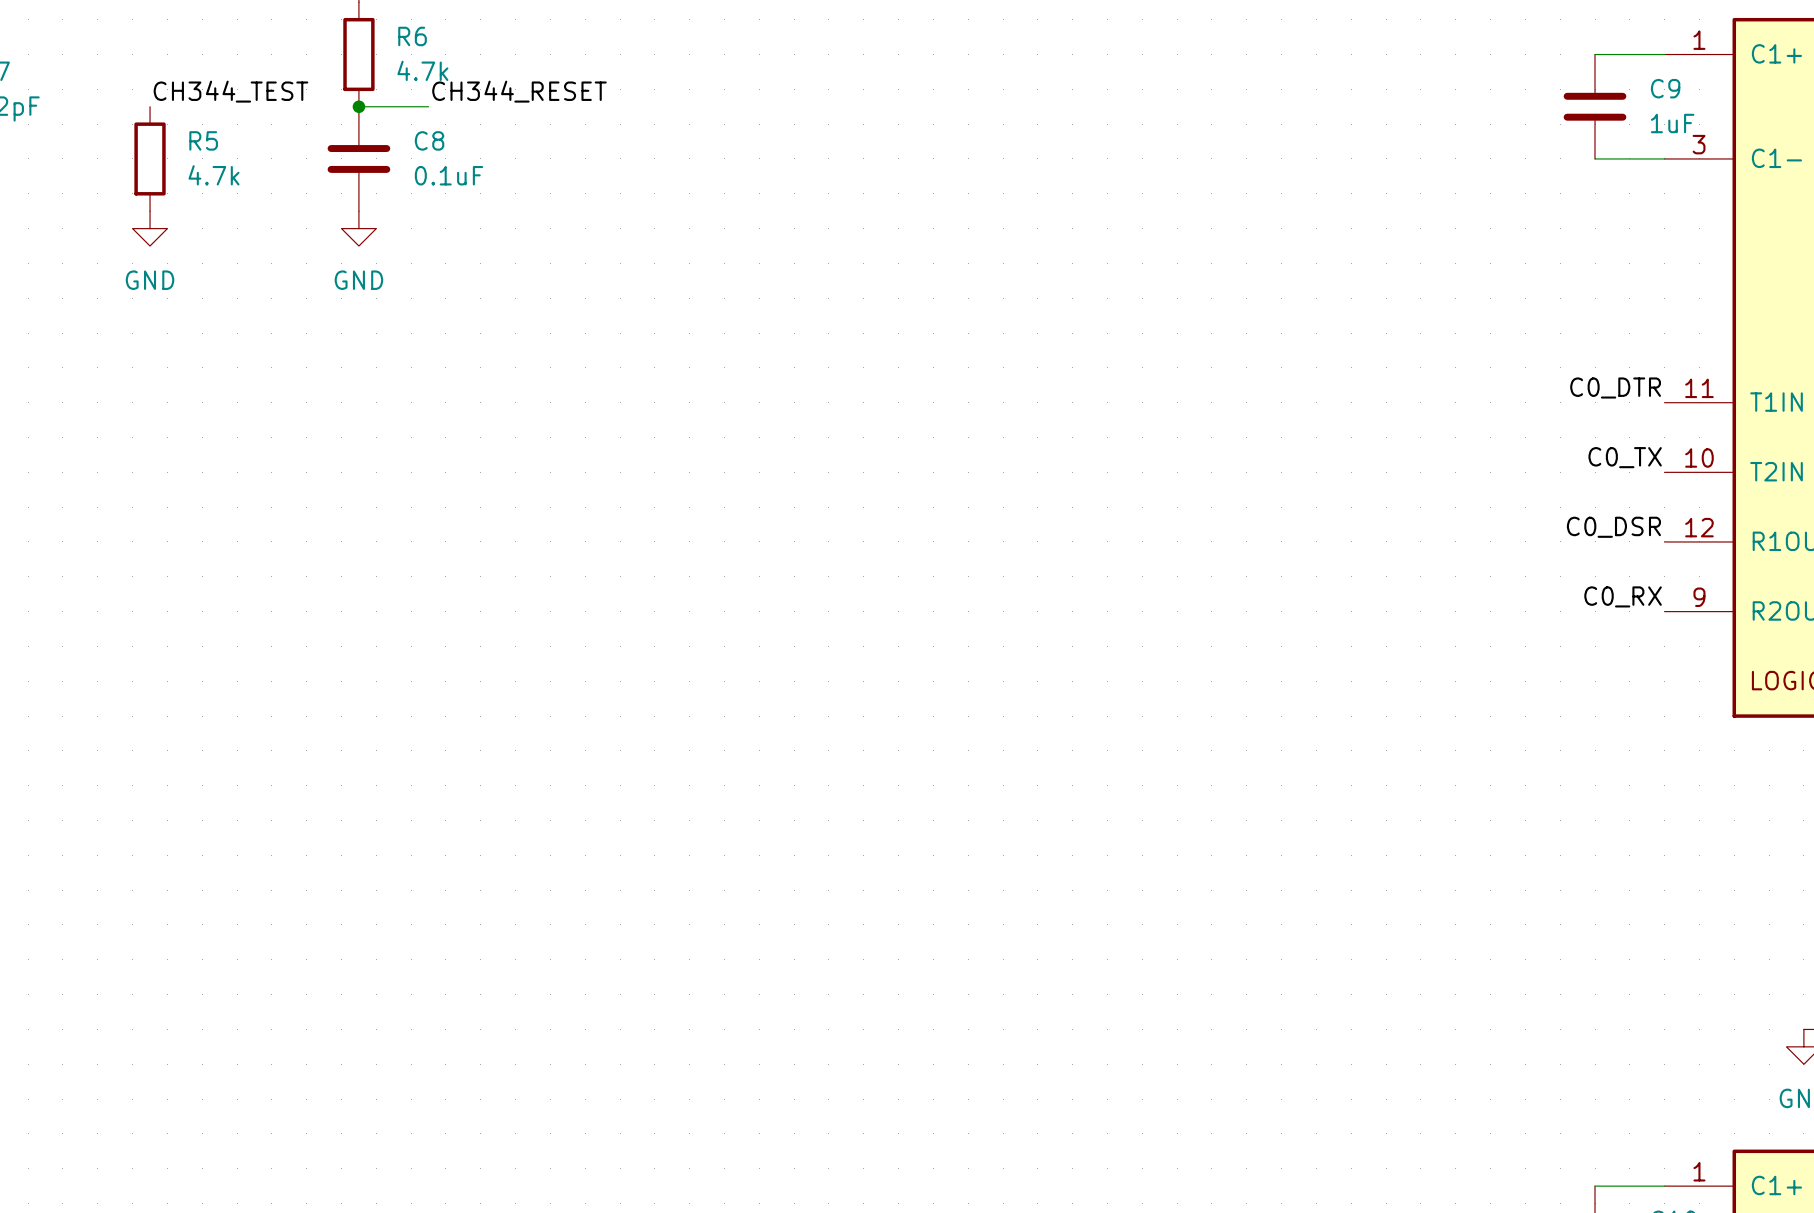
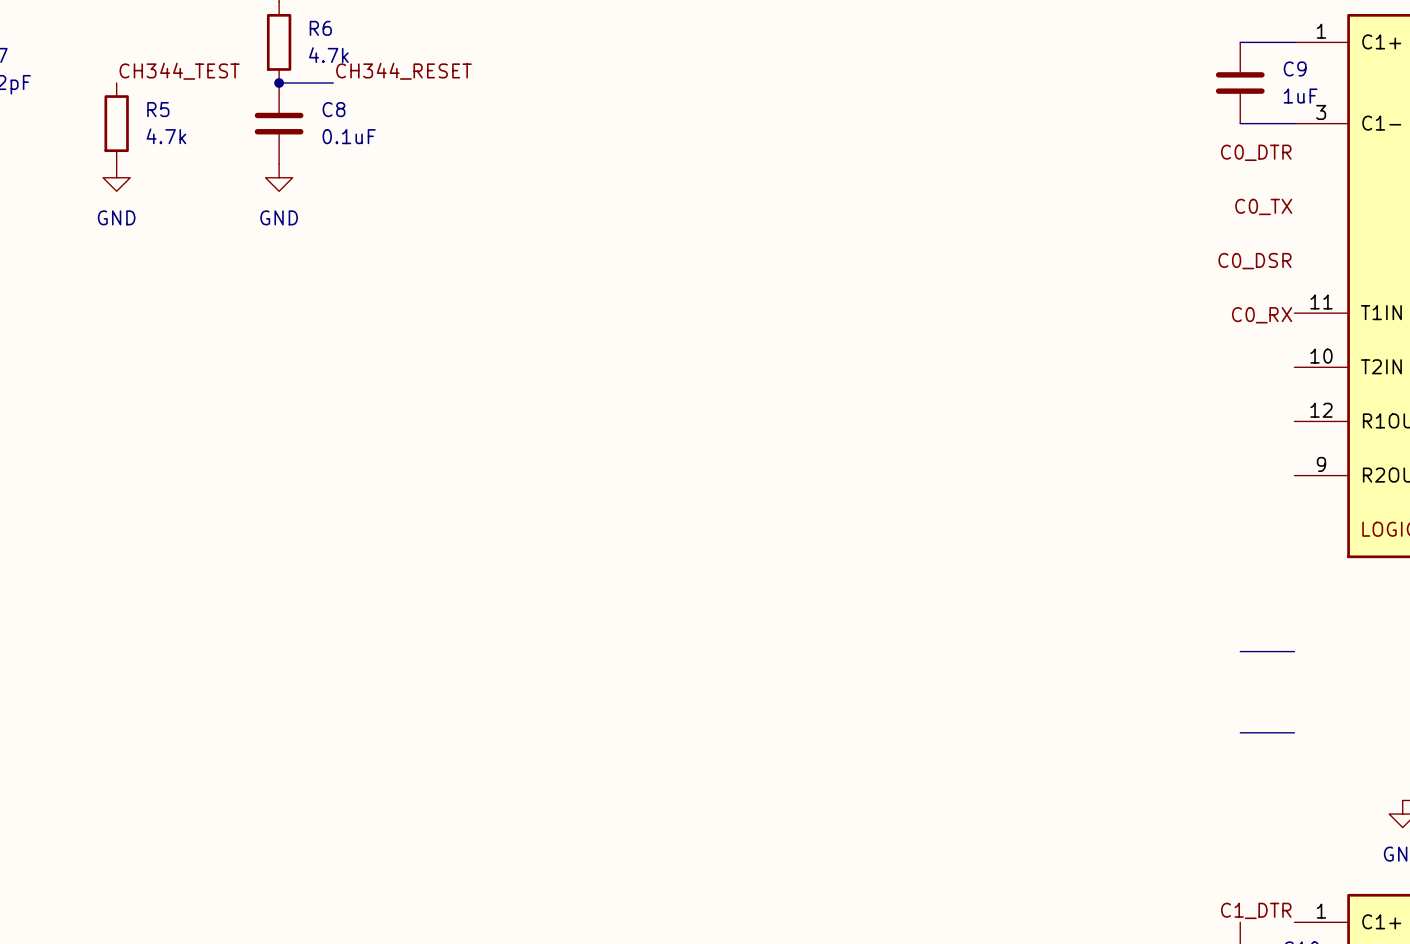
label position: C0_DTR (1615, 388) -> C0_DTR (1256, 152)
label position: C0_TX (1625, 457) -> C0_TX (1263, 206)
label position: C0_DSR (1613, 527) -> C0_DSR (1254, 261)
label position: C0_RX (1623, 596) -> C0_RX (1262, 315)
wire: none -> (1240, 651) (1294, 651)
label: none -> C1_DTR (1256, 910)
wire: (1595, 1186) (1664, 1186) -> (1240, 732) (1294, 732)

